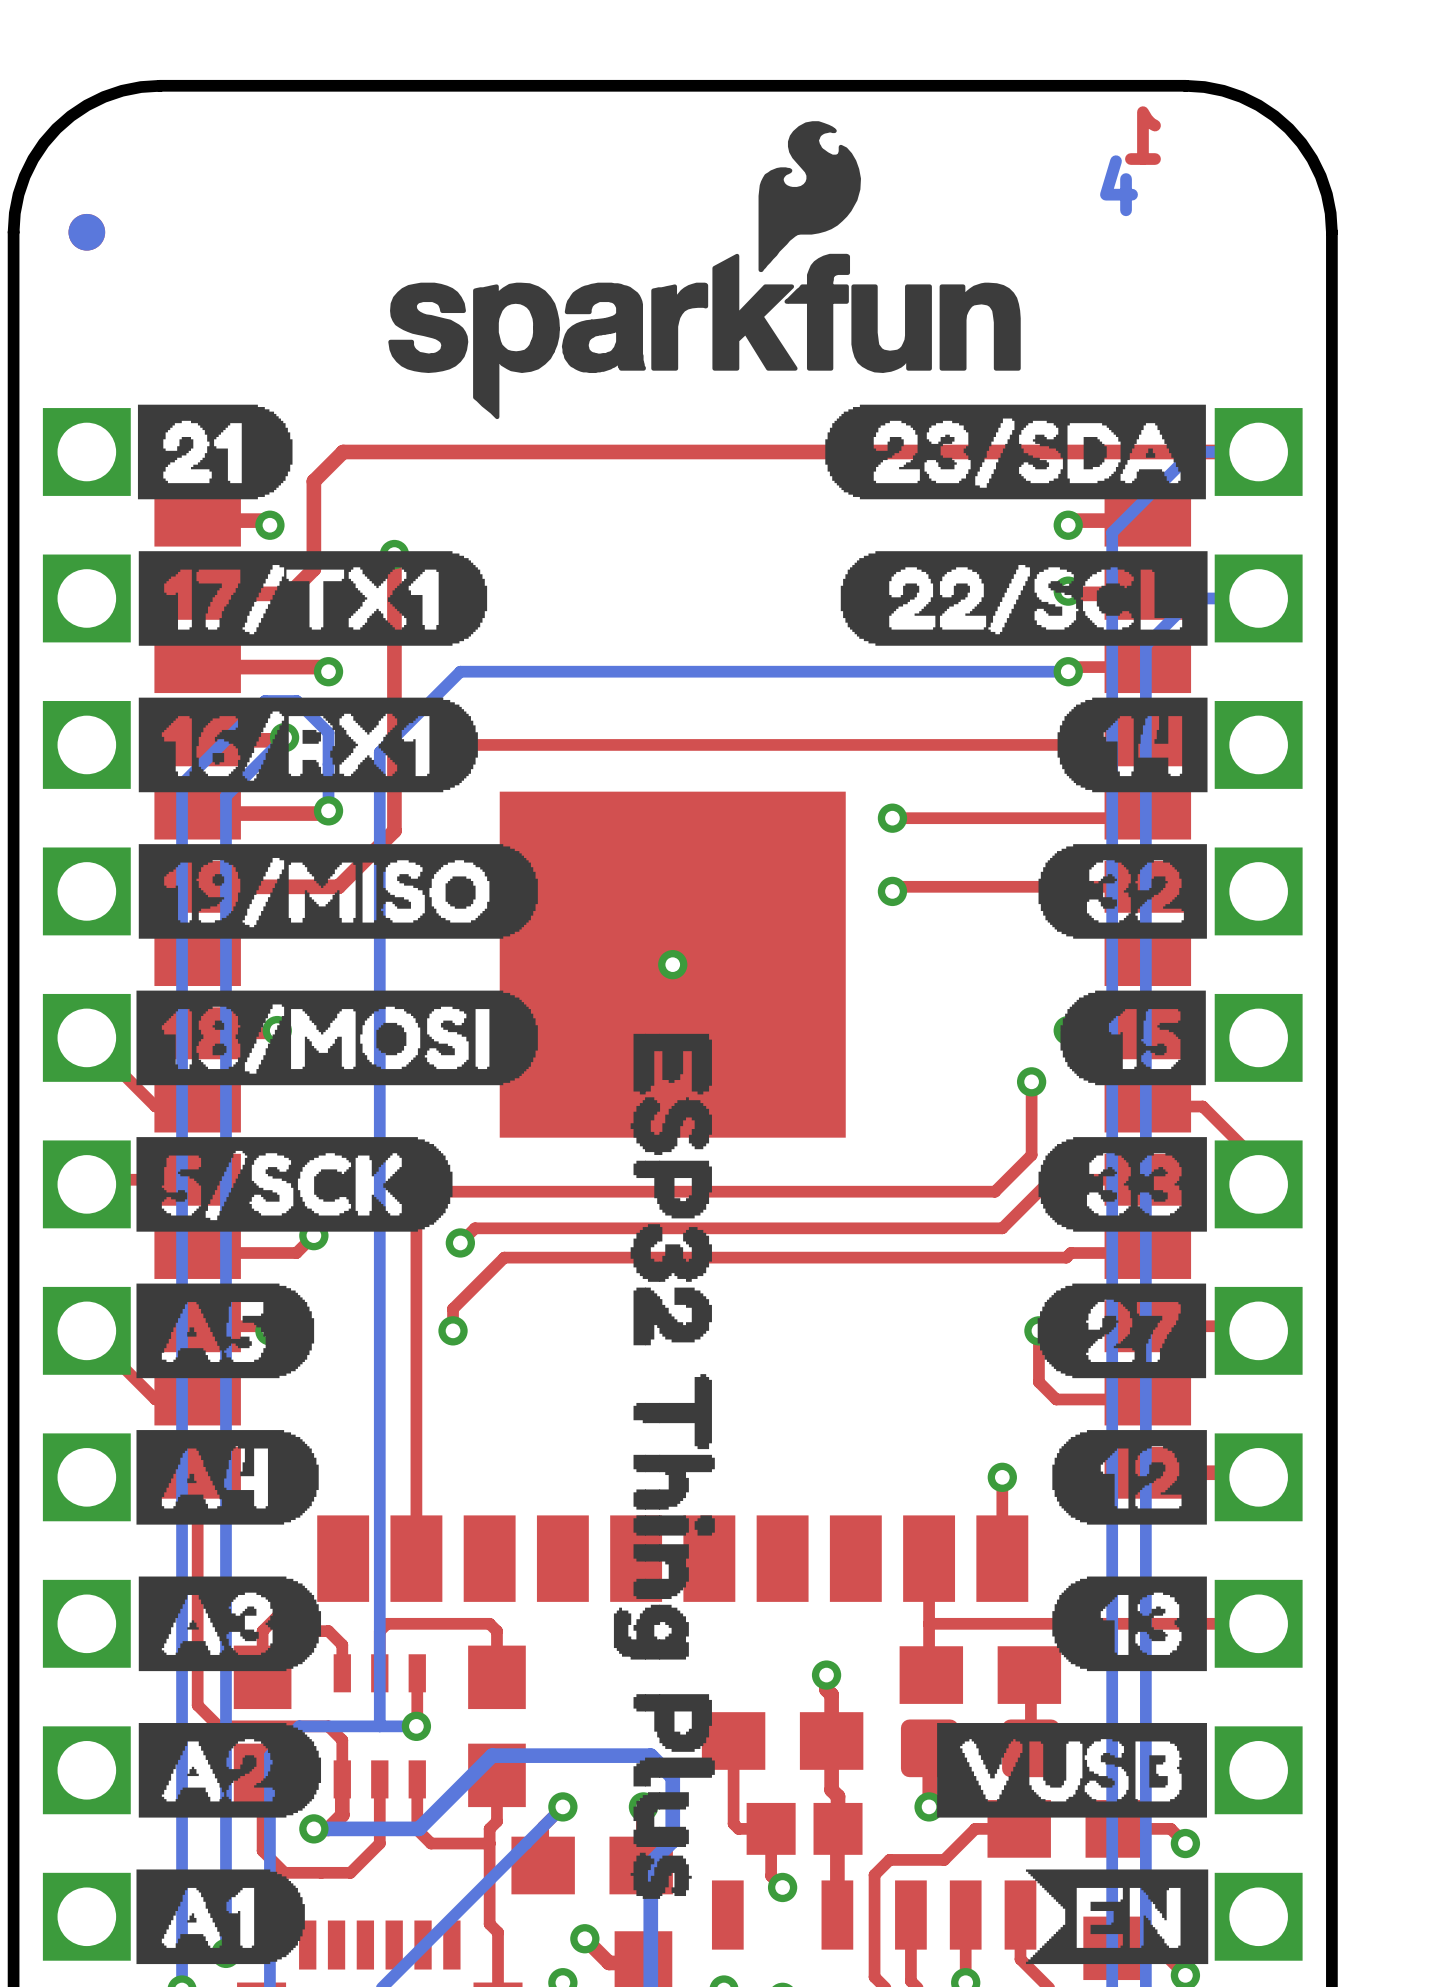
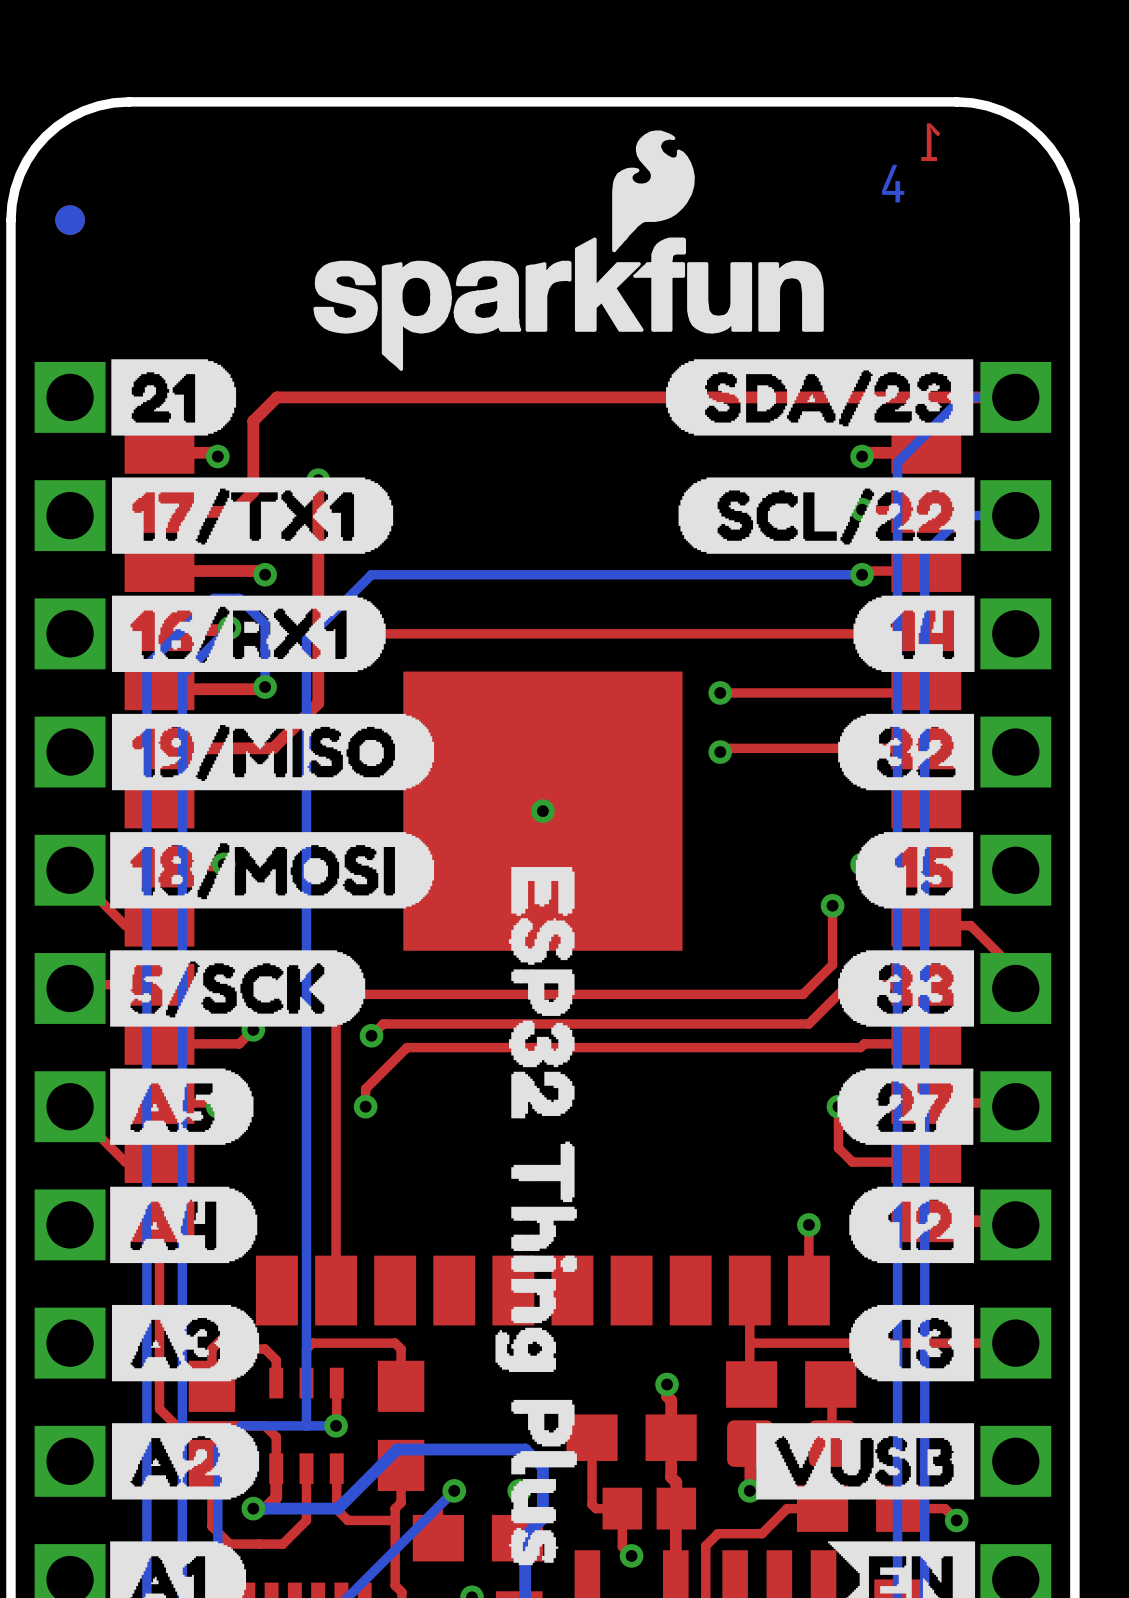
drawing shape: [825, 404, 1206, 500] -> [666, 359, 974, 436]
drawing shape: [840, 551, 1208, 646] -> [678, 477, 975, 554]

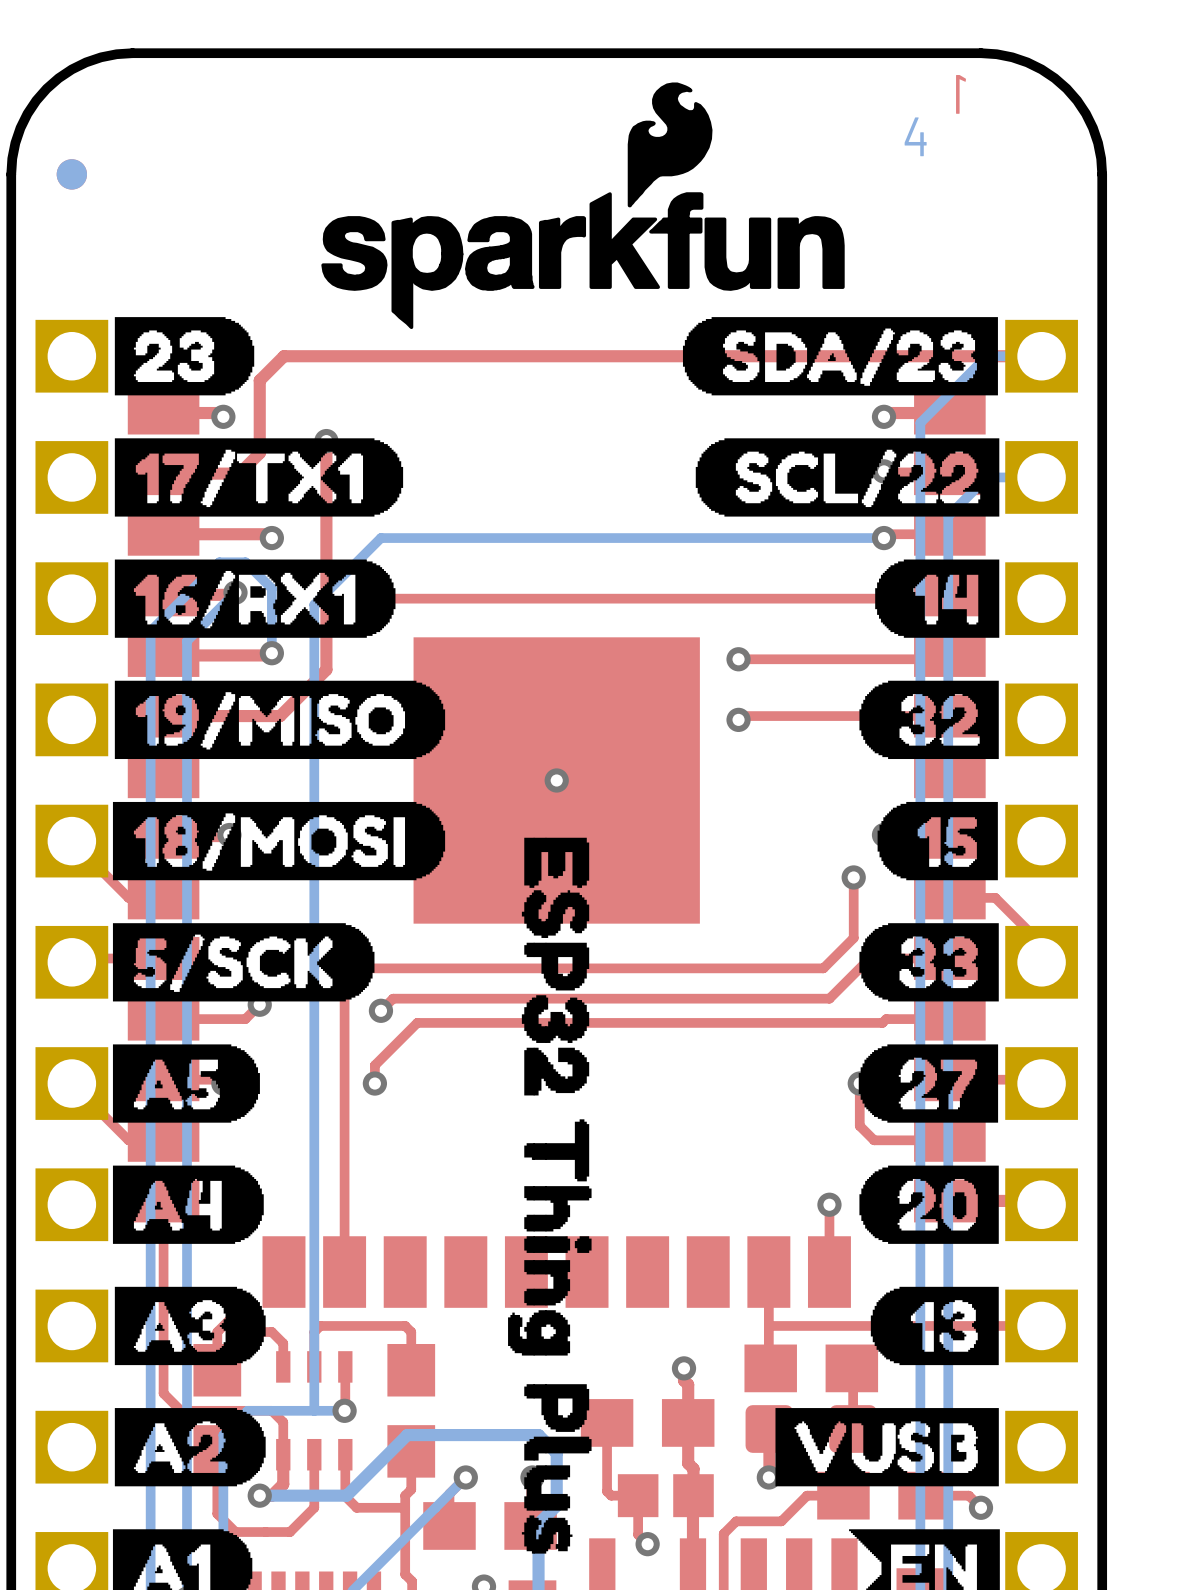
drawing shape: [111, 359, 237, 436] -> [114, 317, 255, 396]
drawing shape: [849, 1186, 975, 1264] -> [859, 1165, 999, 1244]

